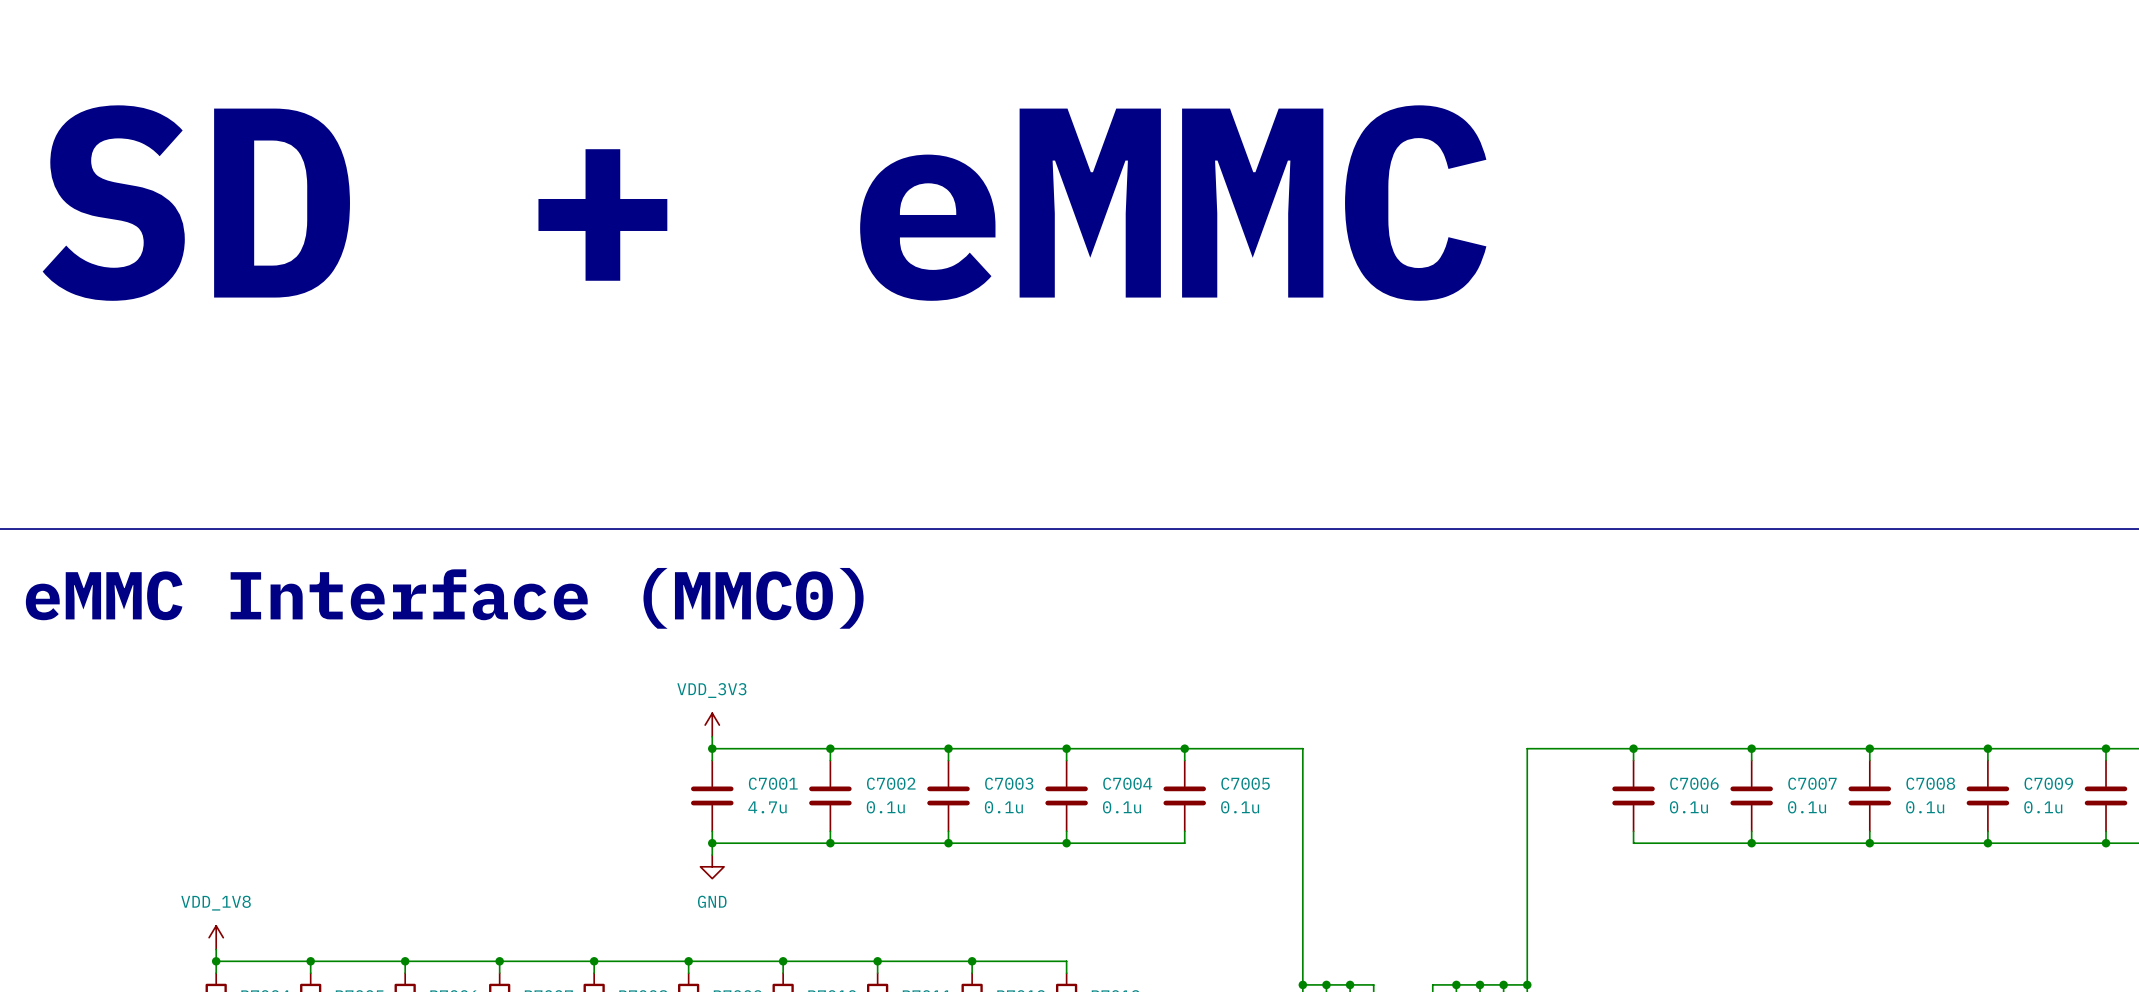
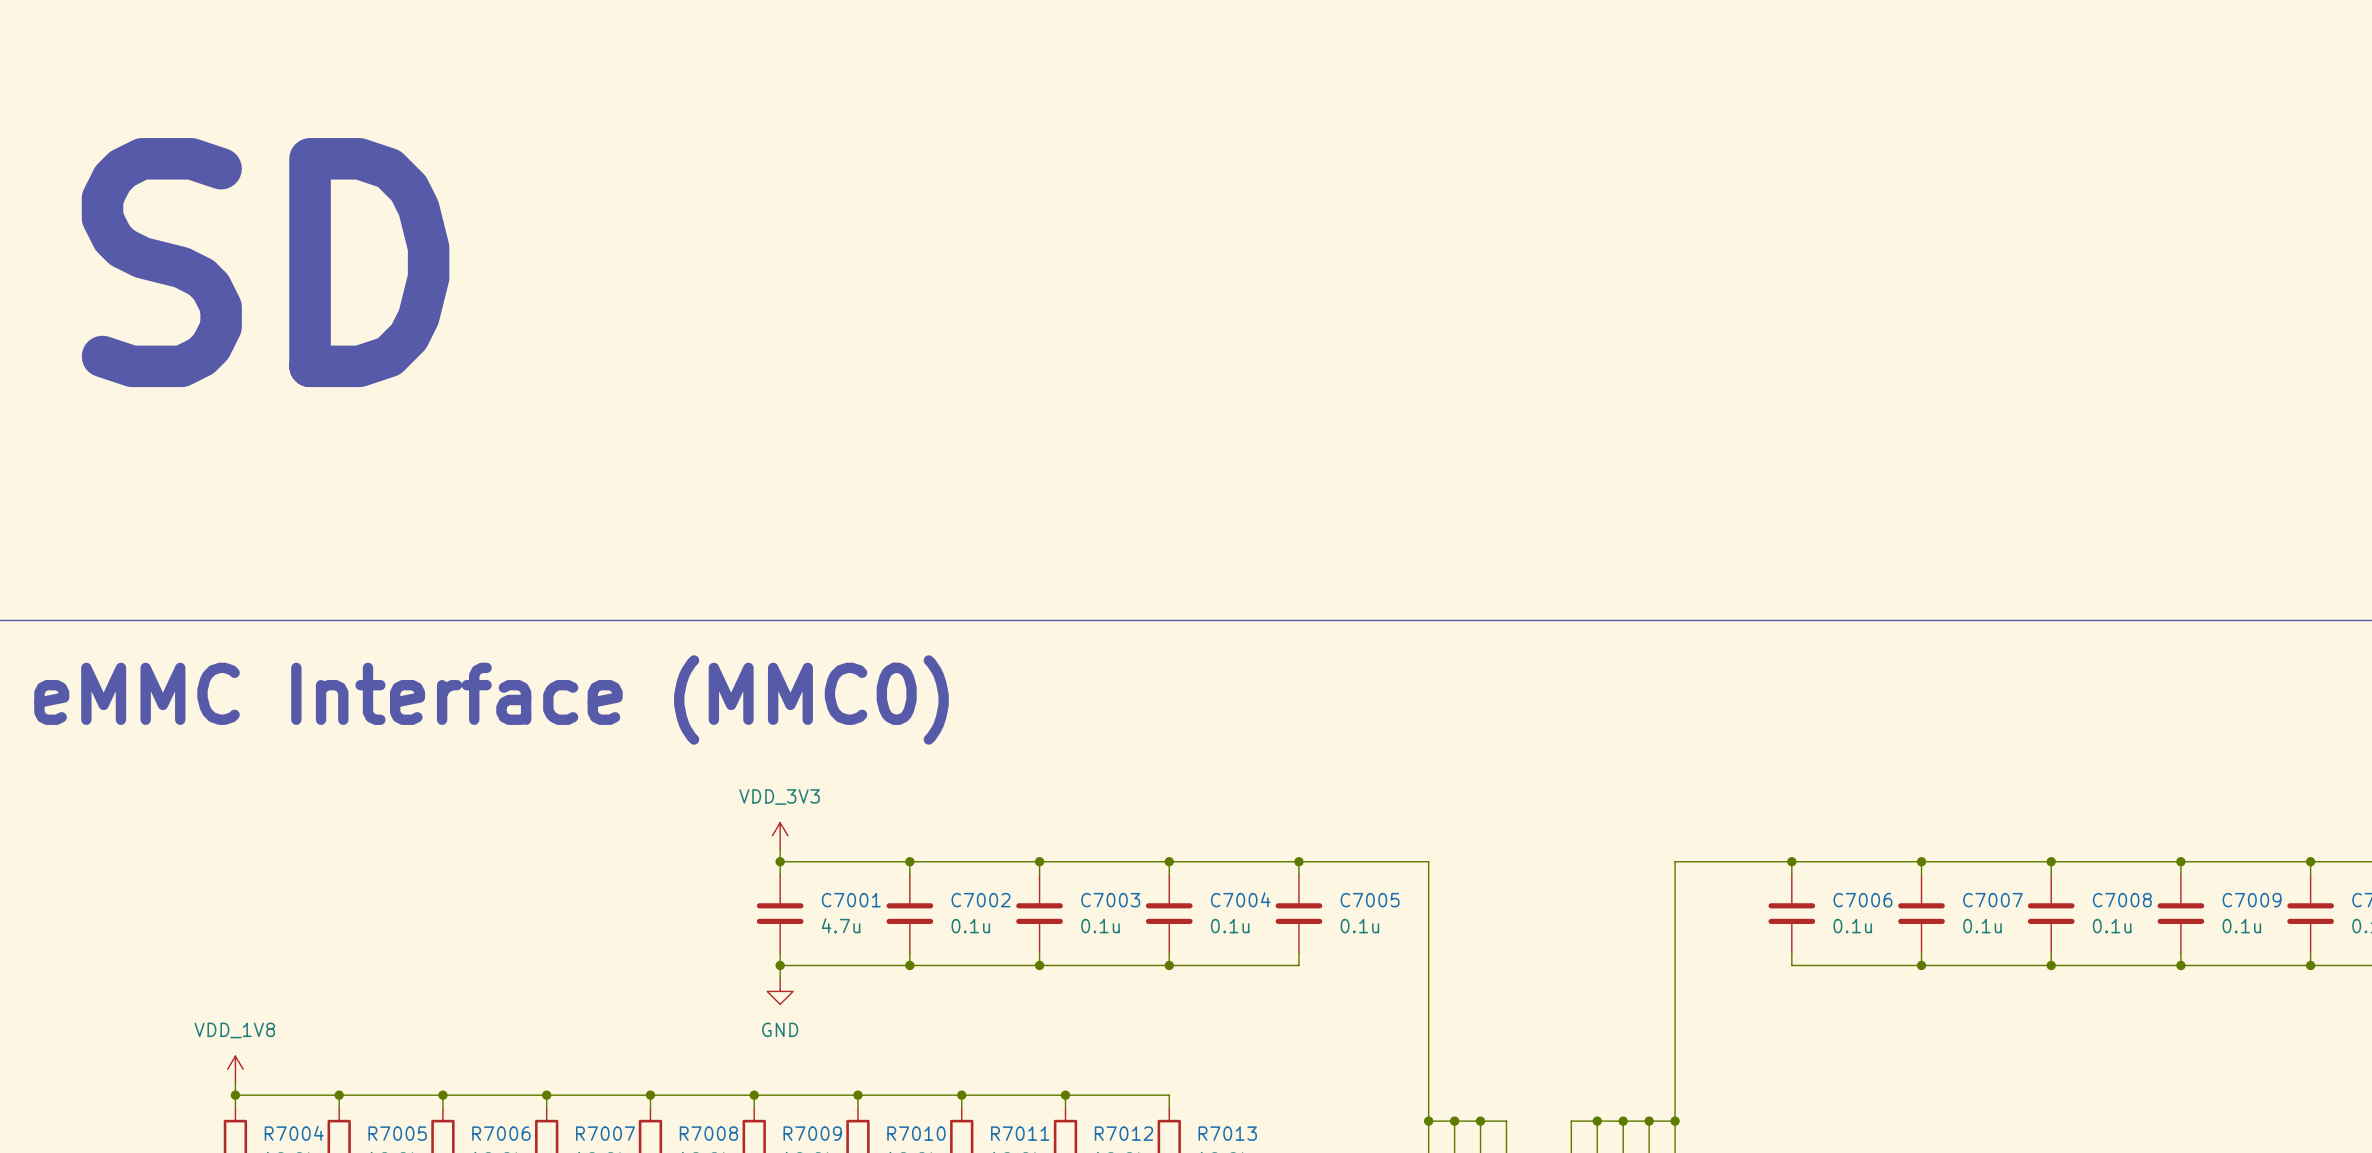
text: SD + eMMC (764, 203) -> SD (265, 262)

